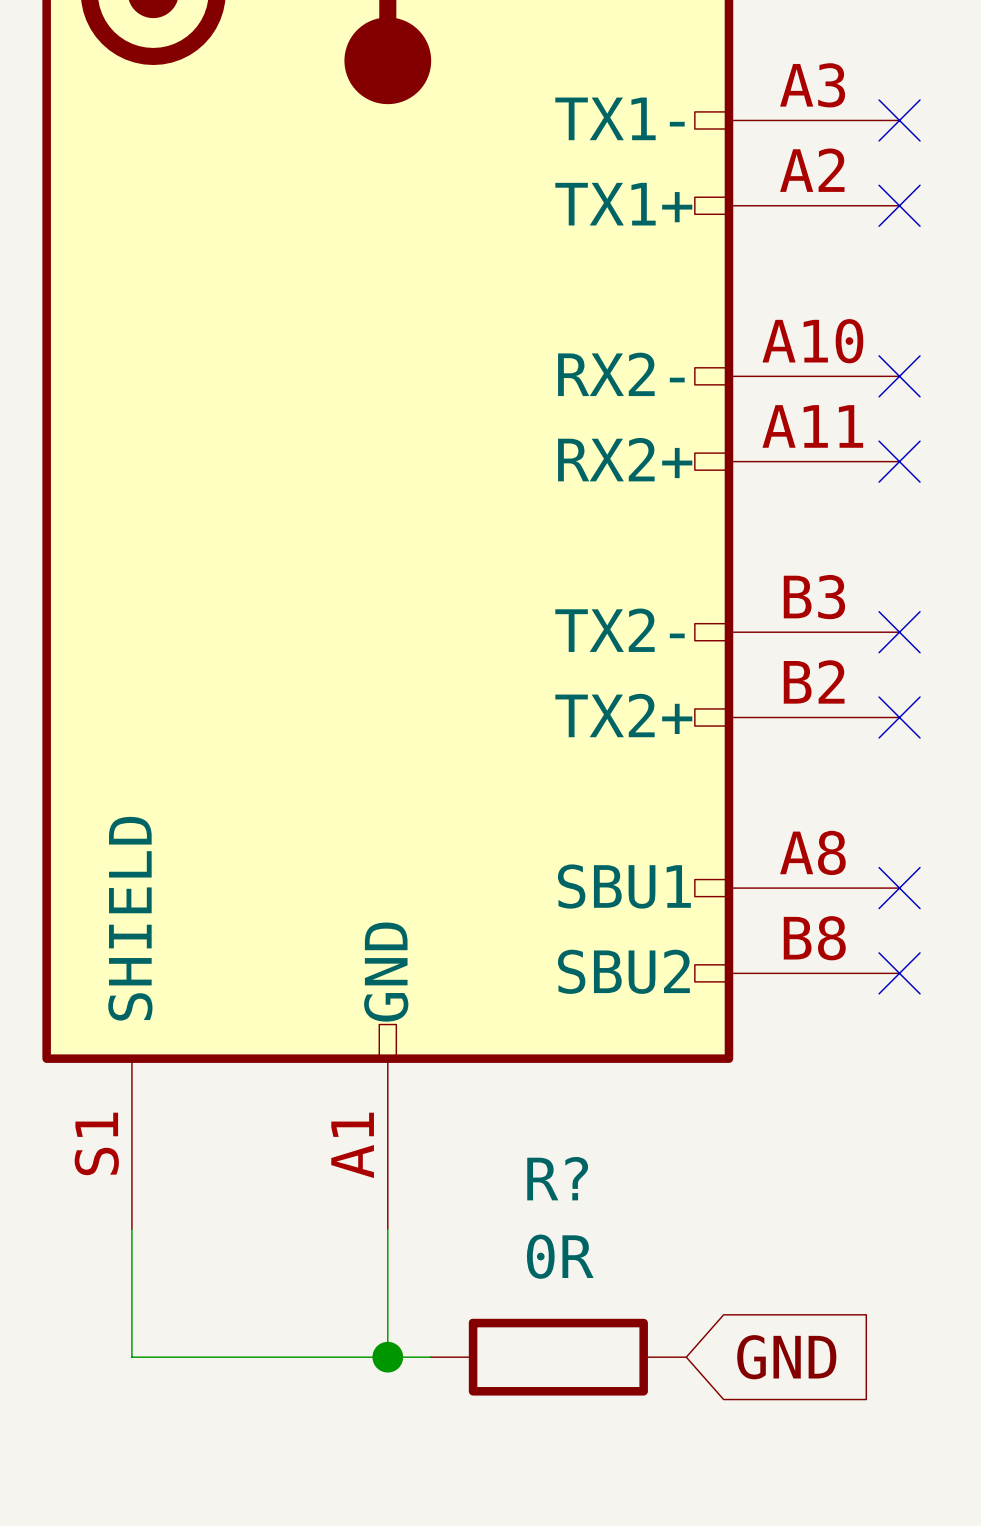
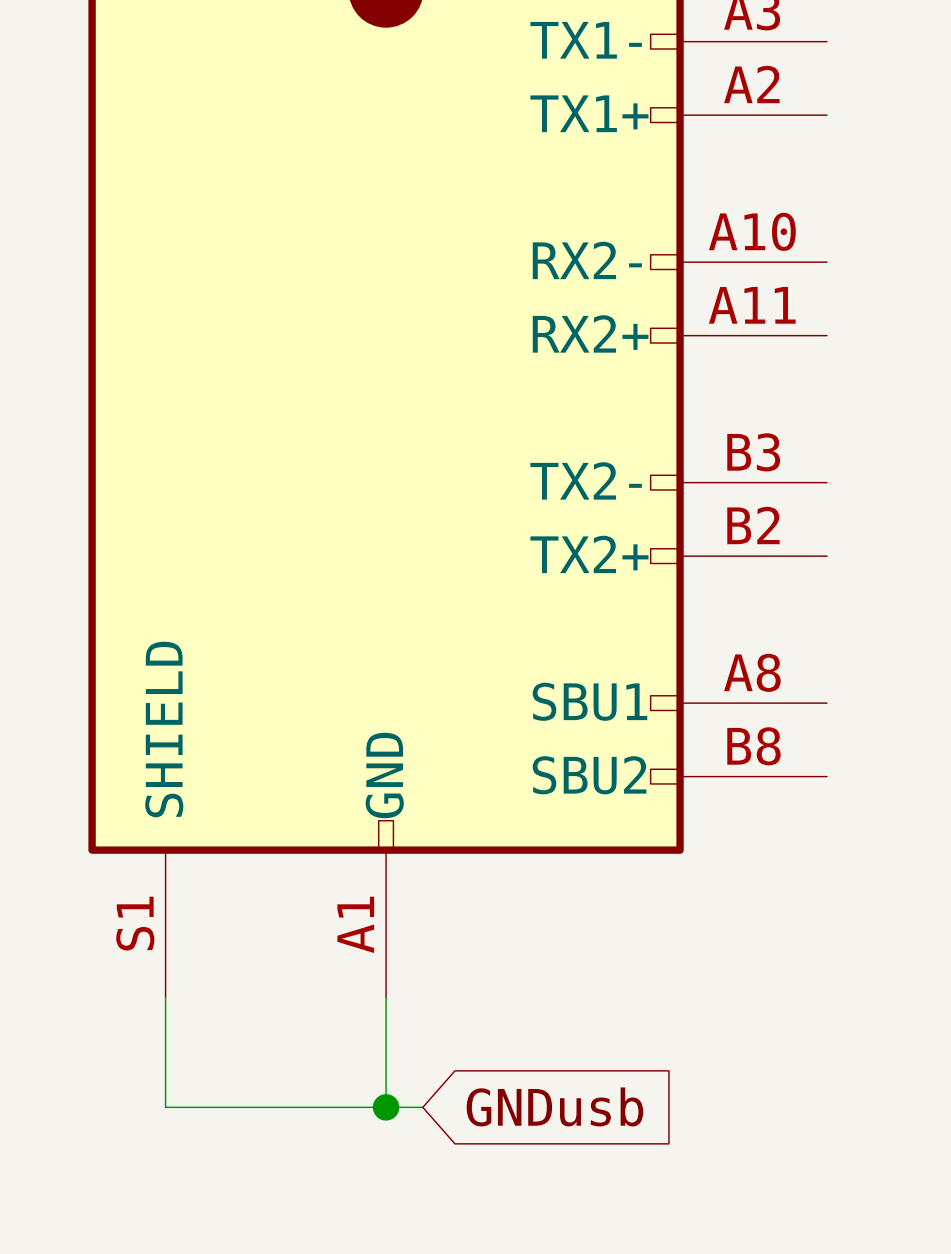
no-connect mark: (899, 120) -> none
no-connect mark: (899, 205) -> none
no-connect mark: (899, 376) -> none
no-connect mark: (899, 461) -> none
no-connect mark: (899, 632) -> none
no-connect mark: (899, 717) -> none
no-connect mark: (899, 888) -> none
no-connect mark: (899, 973) -> none
R?: 0R (558, 1357) -> none
global label: GND (786, 1357) -> GNDusb (554, 1106)

